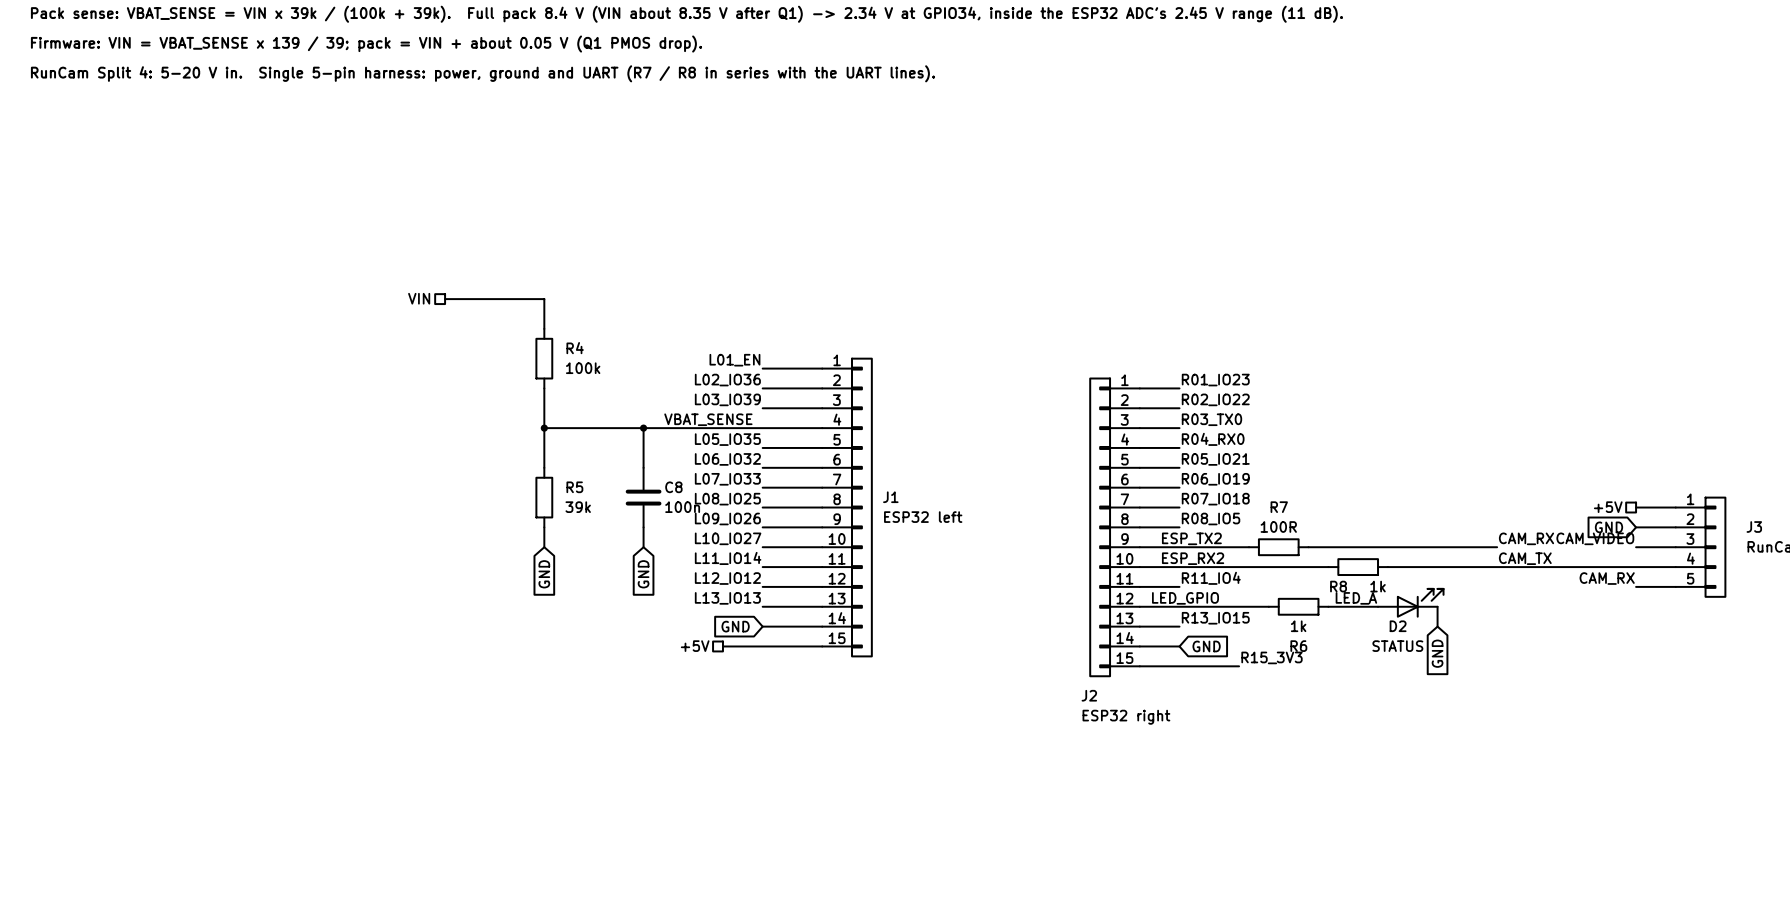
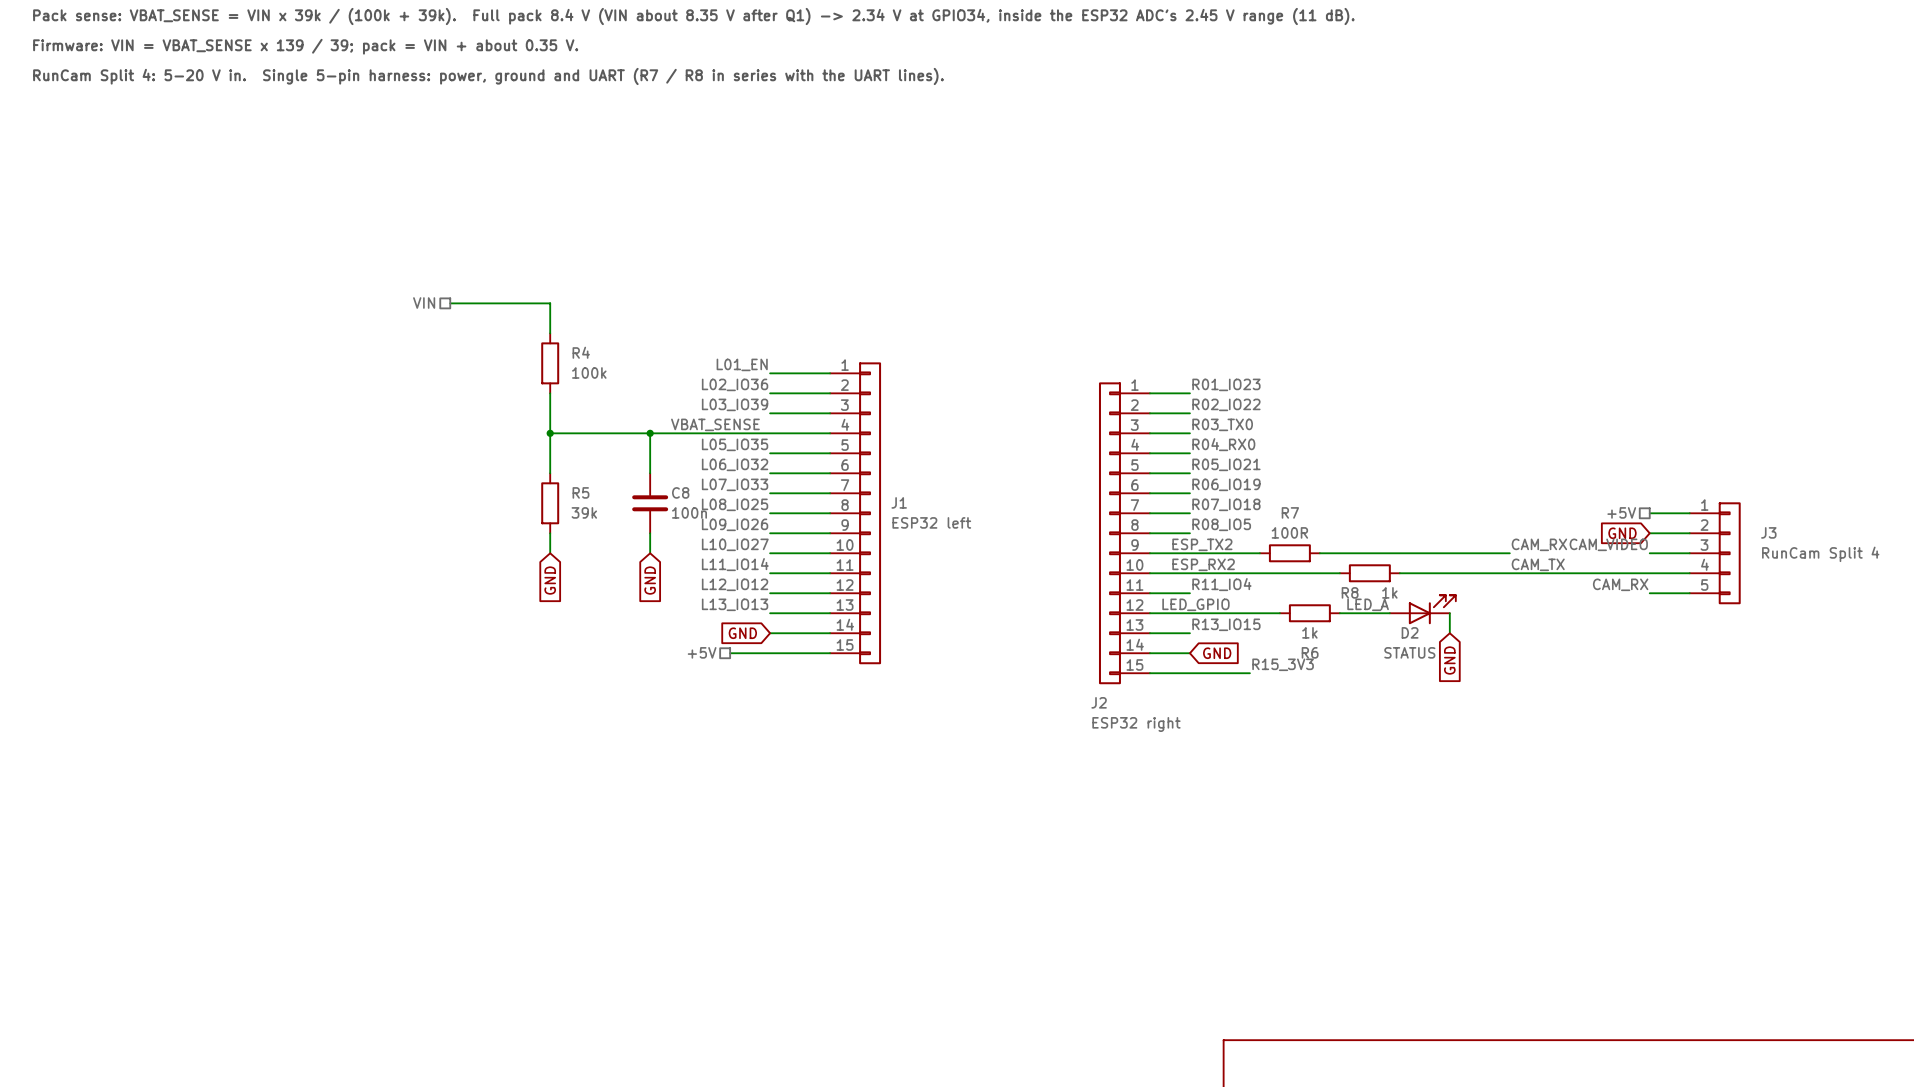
text: Firmware: VIN = VBAT_SENSE x 139 / 39; pack = VIN + about 0.05 V (Q1 PMOS drop). (366, 44) -> Firmware: VIN = VBAT_SENSE x 139 / 39; pack = VIN + about 0.35 V. (305, 46)

